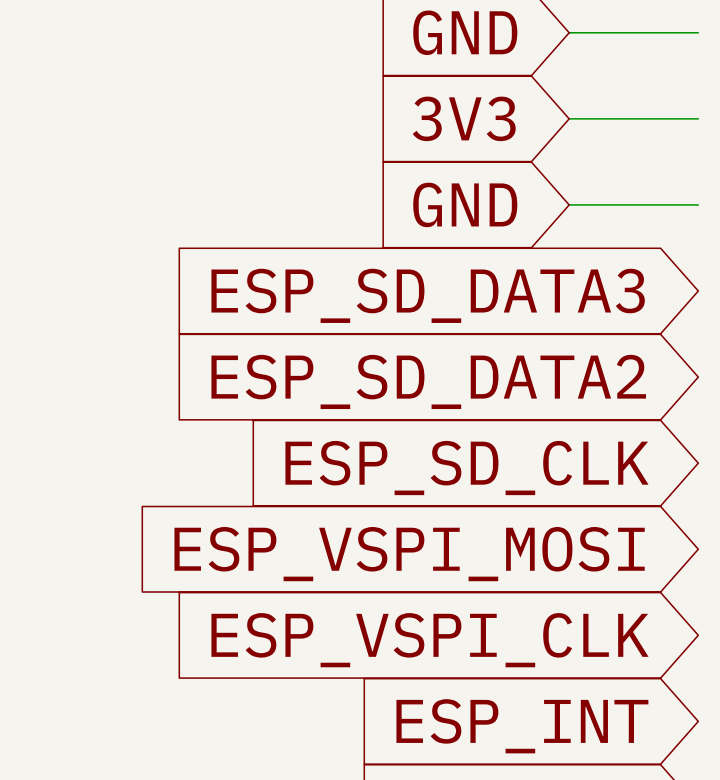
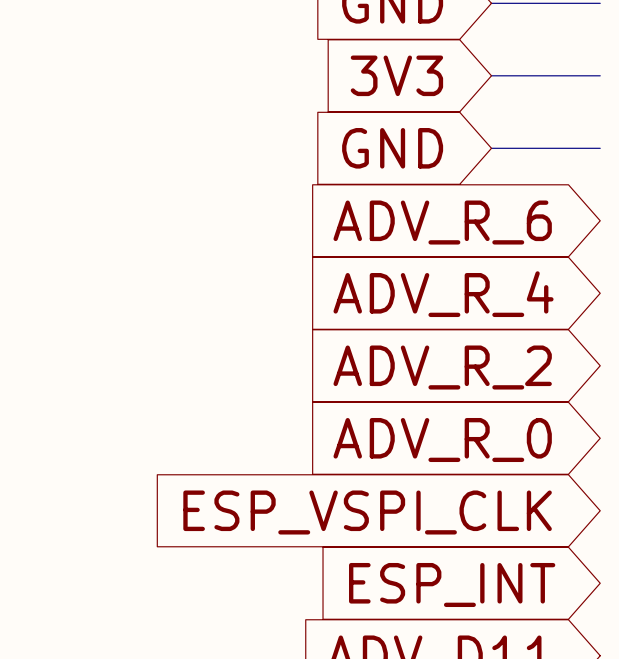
global label: ESP_SD_DATA3 (428, 295) -> ADV_R_6 (442, 222)
global label: ESP_SD_DATA2 (428, 381) -> ADV_R_4 (443, 294)
global label: ESP_SD_CLK (466, 468) -> ADV_R_2 (442, 367)
global label: ESP_VSPI_MOSI (409, 554) -> ADV_R_0 (442, 440)

